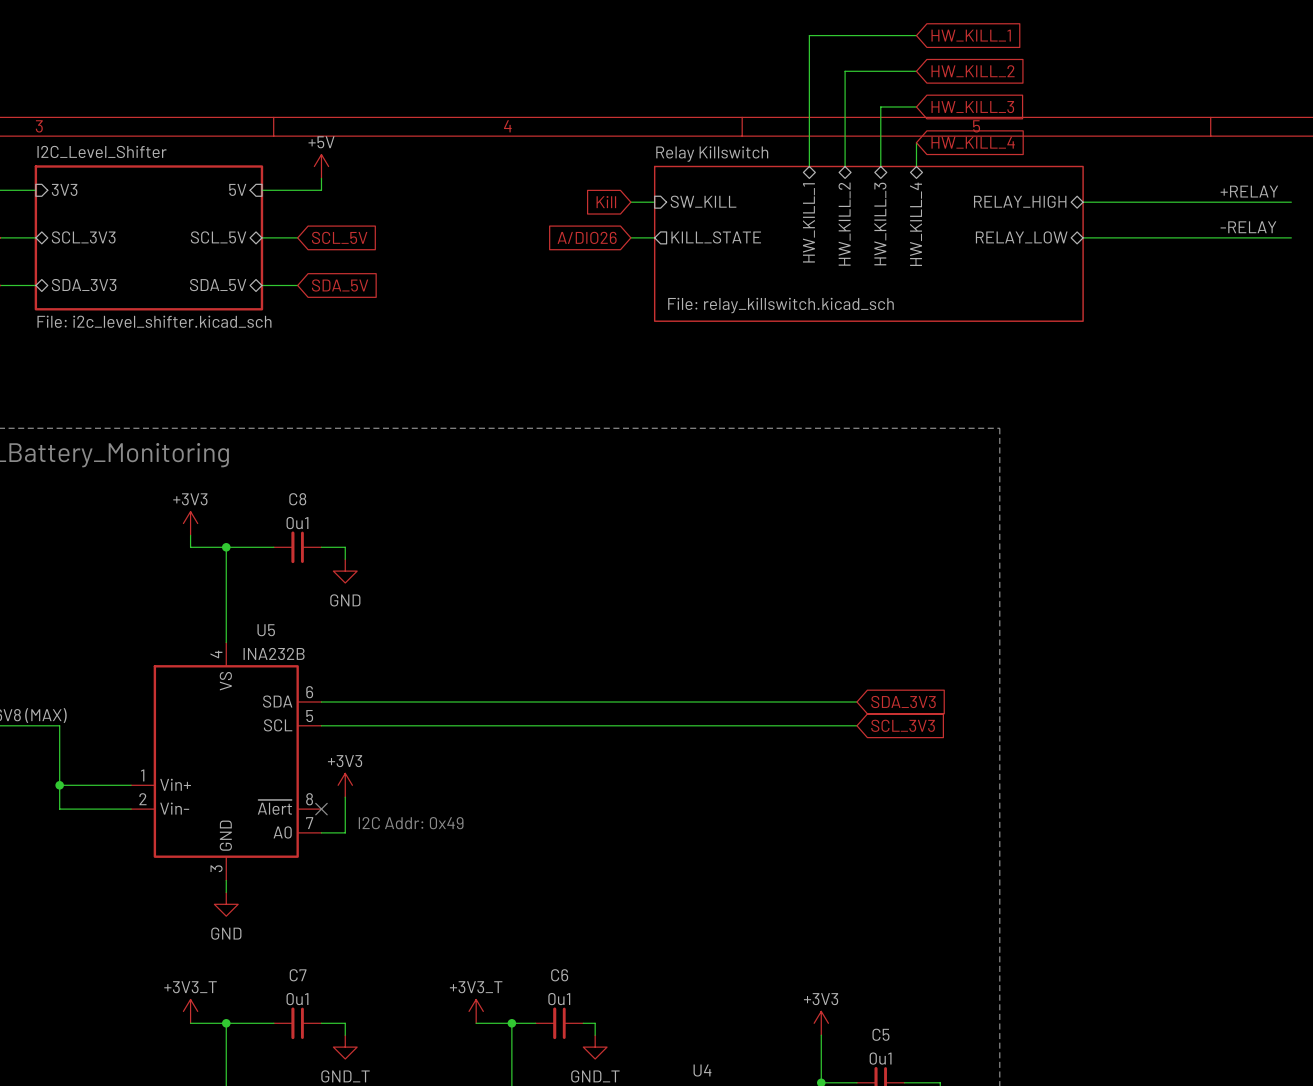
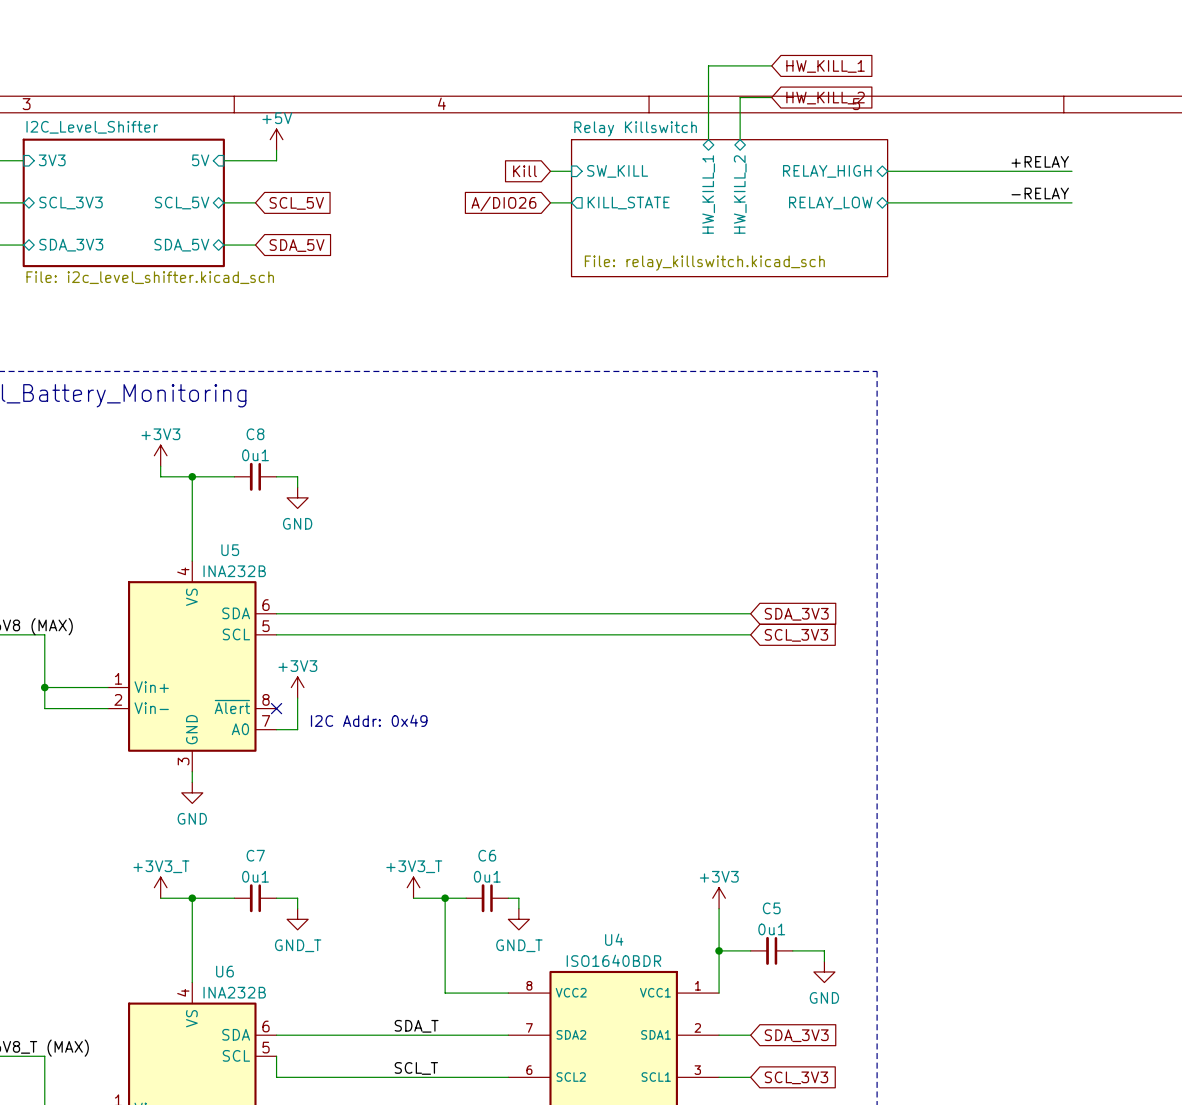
wire: (916, 35) (809, 35) (809, 83) -> (771, 65) (708, 65)
global label position: HW_KILL_1 (971, 35) -> HW_KILL_1 (825, 66)
wire: (916, 71) (845, 71) (845, 118) -> (771, 97) (740, 97)
global label position: HW_KILL_2 (973, 71) -> HW_KILL_2 (825, 98)
wire: (916, 106) (880, 106) (880, 166) -> none
global label: HW_KILL_3 (972, 107) -> none
wire: (916, 142) (916, 166) -> none
global label: HW_KILL_4 (973, 142) -> none
label position: +RELAY (1249, 191) -> +RELAY (1040, 161)
sheet pin position: RELAY_HIGH (1020, 201) -> RELAY_HIGH (827, 171)
wire: (1219, 202) (1291, 202) -> (887, 171) (950, 171)
sheet pin: HW_KILL_3 (880, 224) -> none
sheet pin: HW_KILL_4 (916, 224) -> none
label position: -RELAY (1248, 227) -> -RELAY (1040, 193)
sheet pin position: RELAY_LOW (1021, 237) -> RELAY_LOW (830, 203)
wire: (1219, 237) (1291, 237) -> (887, 202) (950, 202)
sheet Relay Killswitch: none -> File: relay_killswitch.kicad_sch (729, 208)
sheet Relay Killswitch: File: relay_killswitch.kicad_sch (868, 243) -> none

